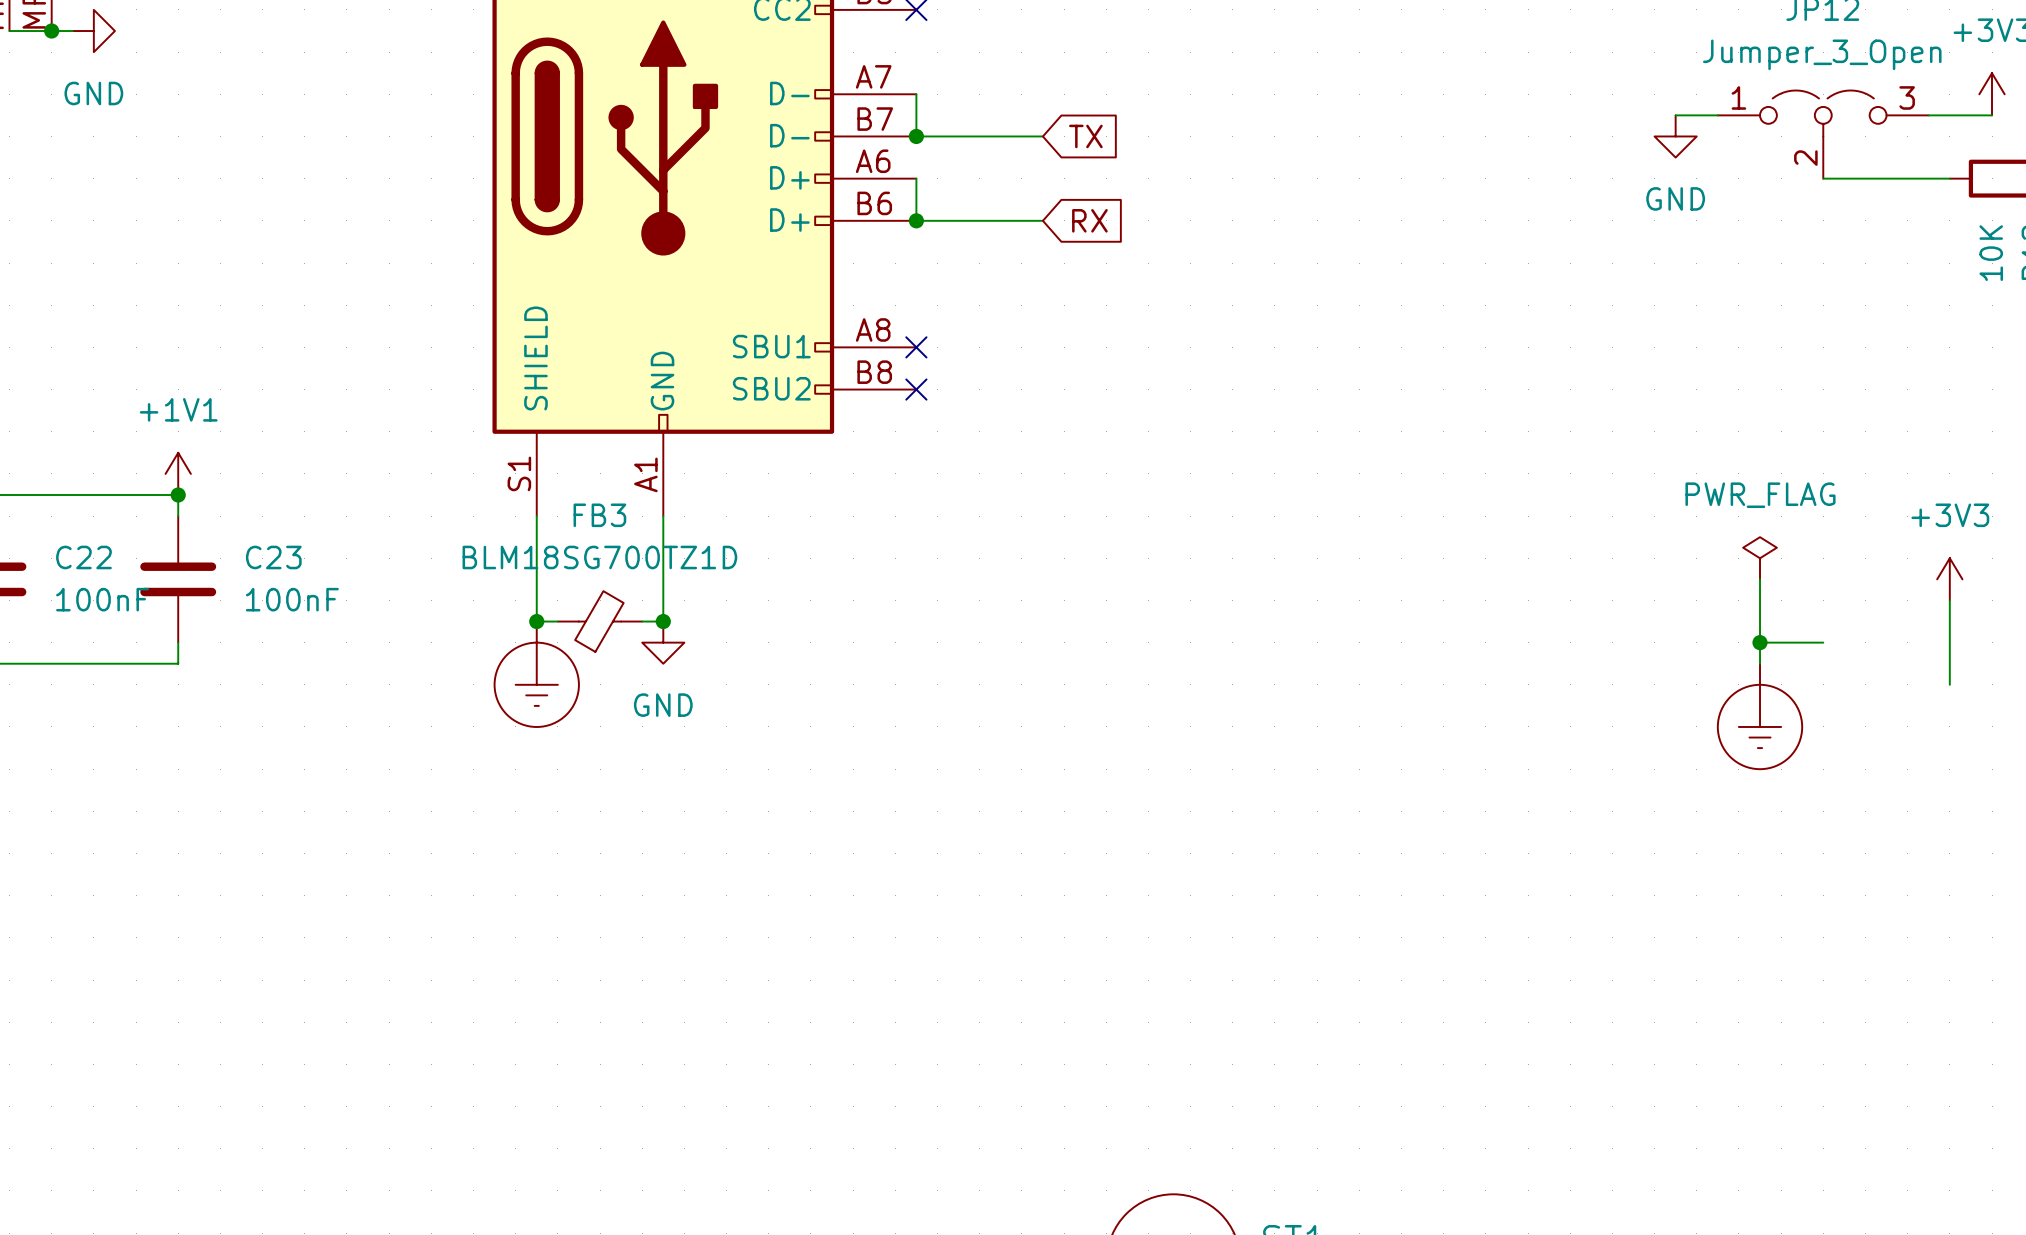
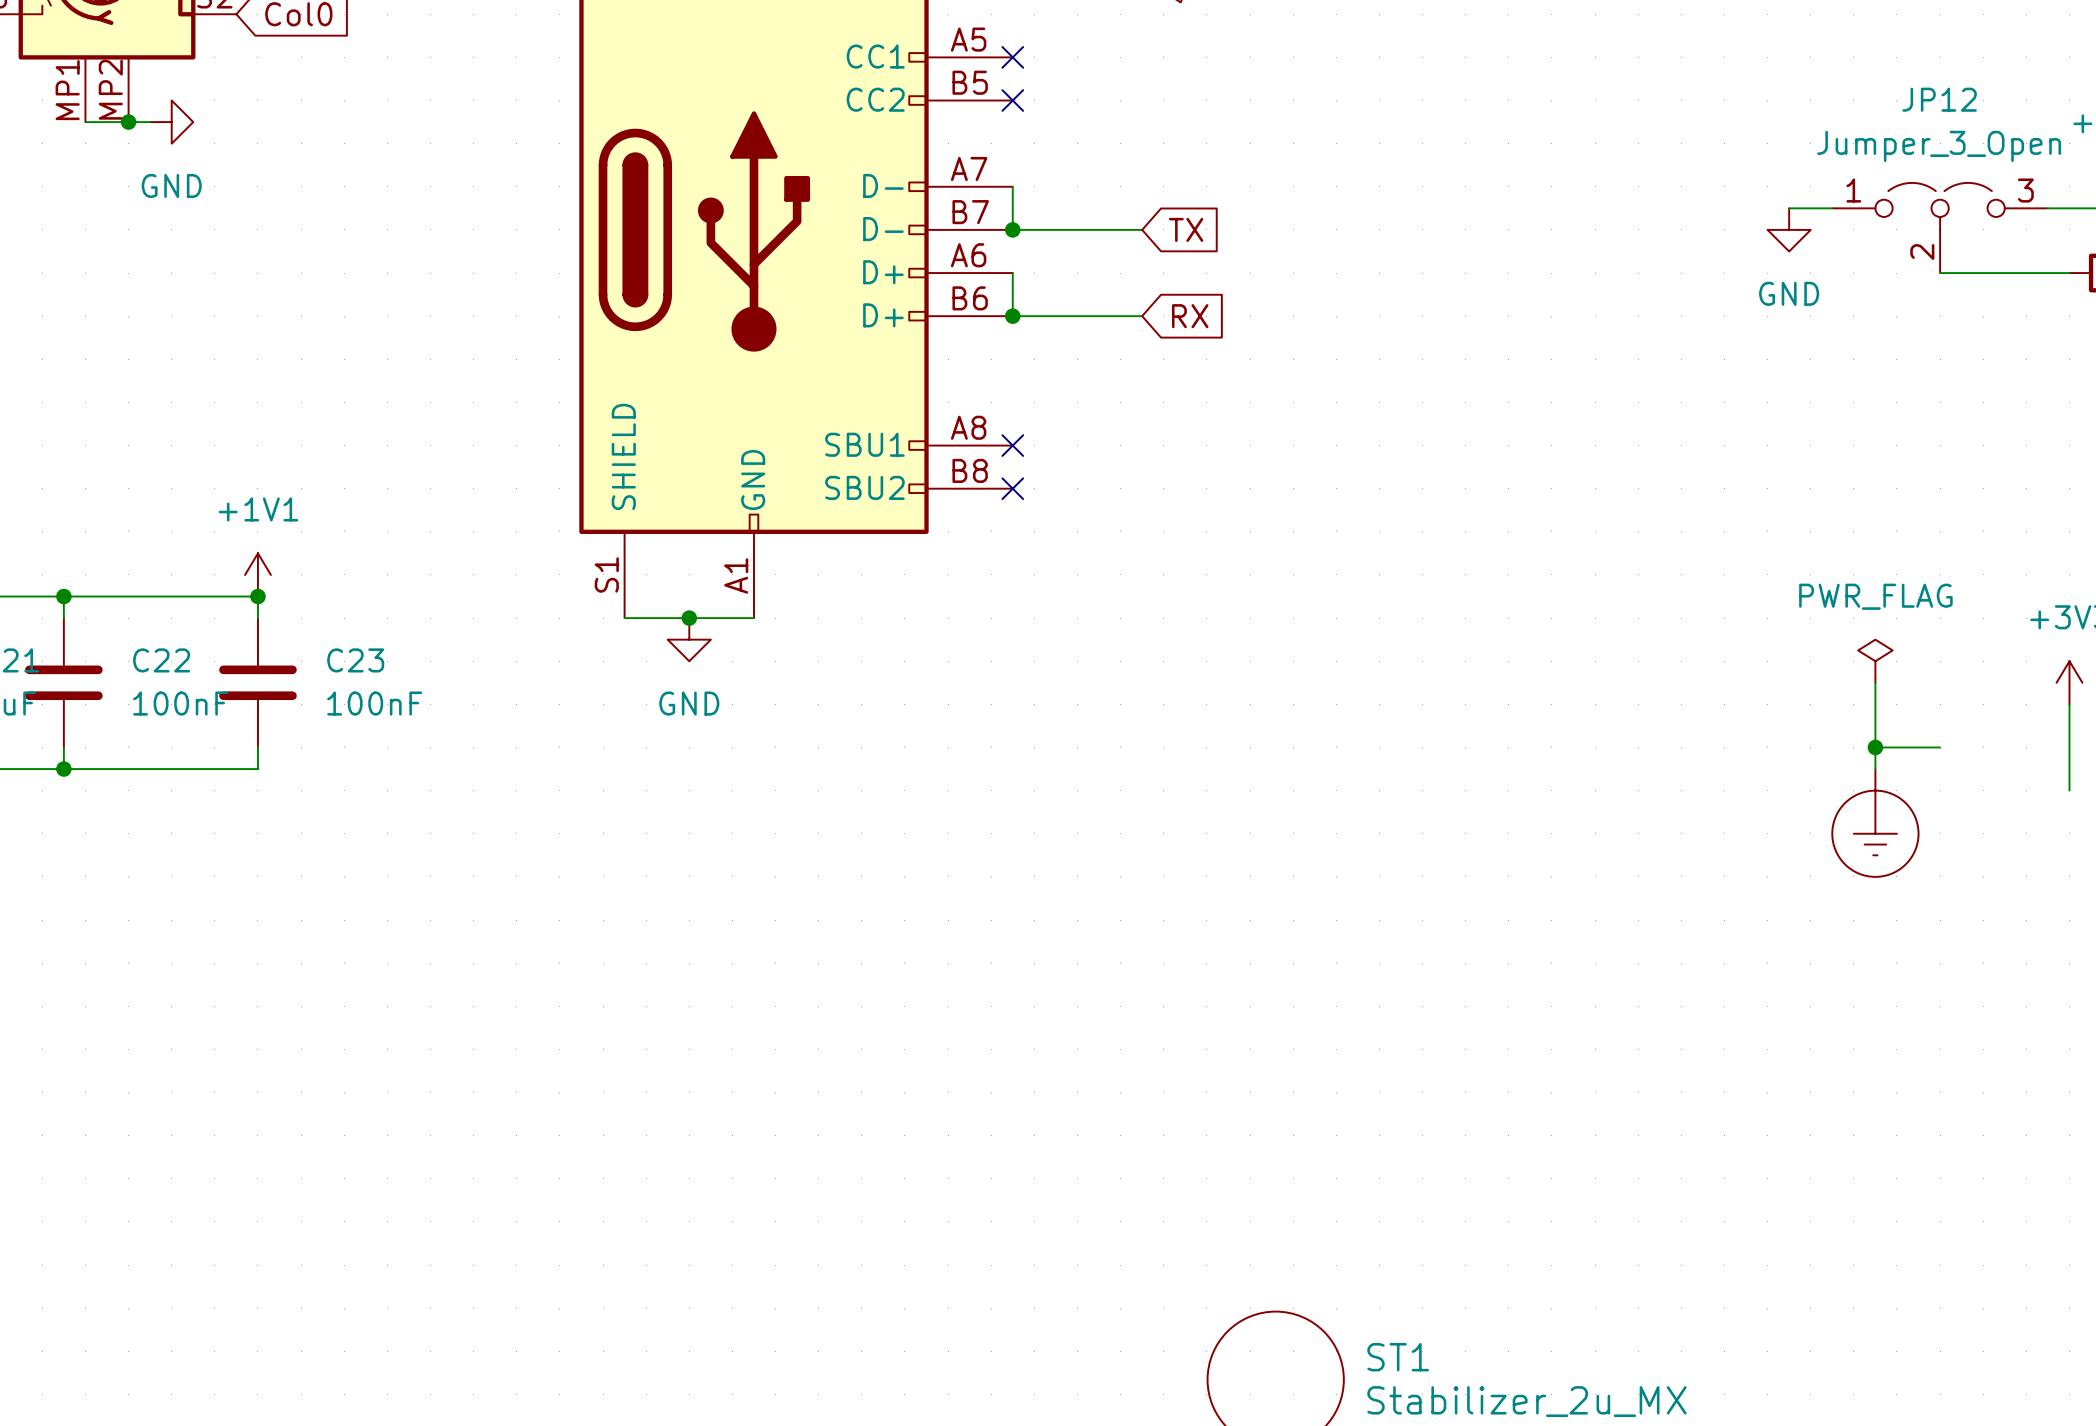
wire: (536, 516) (536, 621) (557, 621) -> (624, 618) (753, 618)
junction: none -> (689, 618)
wire: (663, 516) (663, 621) (642, 621) -> none
junction: (536, 621) -> none
FB3: BLM18SG700TZ1D (600, 621) -> none
junction: (663, 621) -> none
power symbol position: GND (663, 642) -> GND (689, 639)
power symbol: (536, 674) -> none

